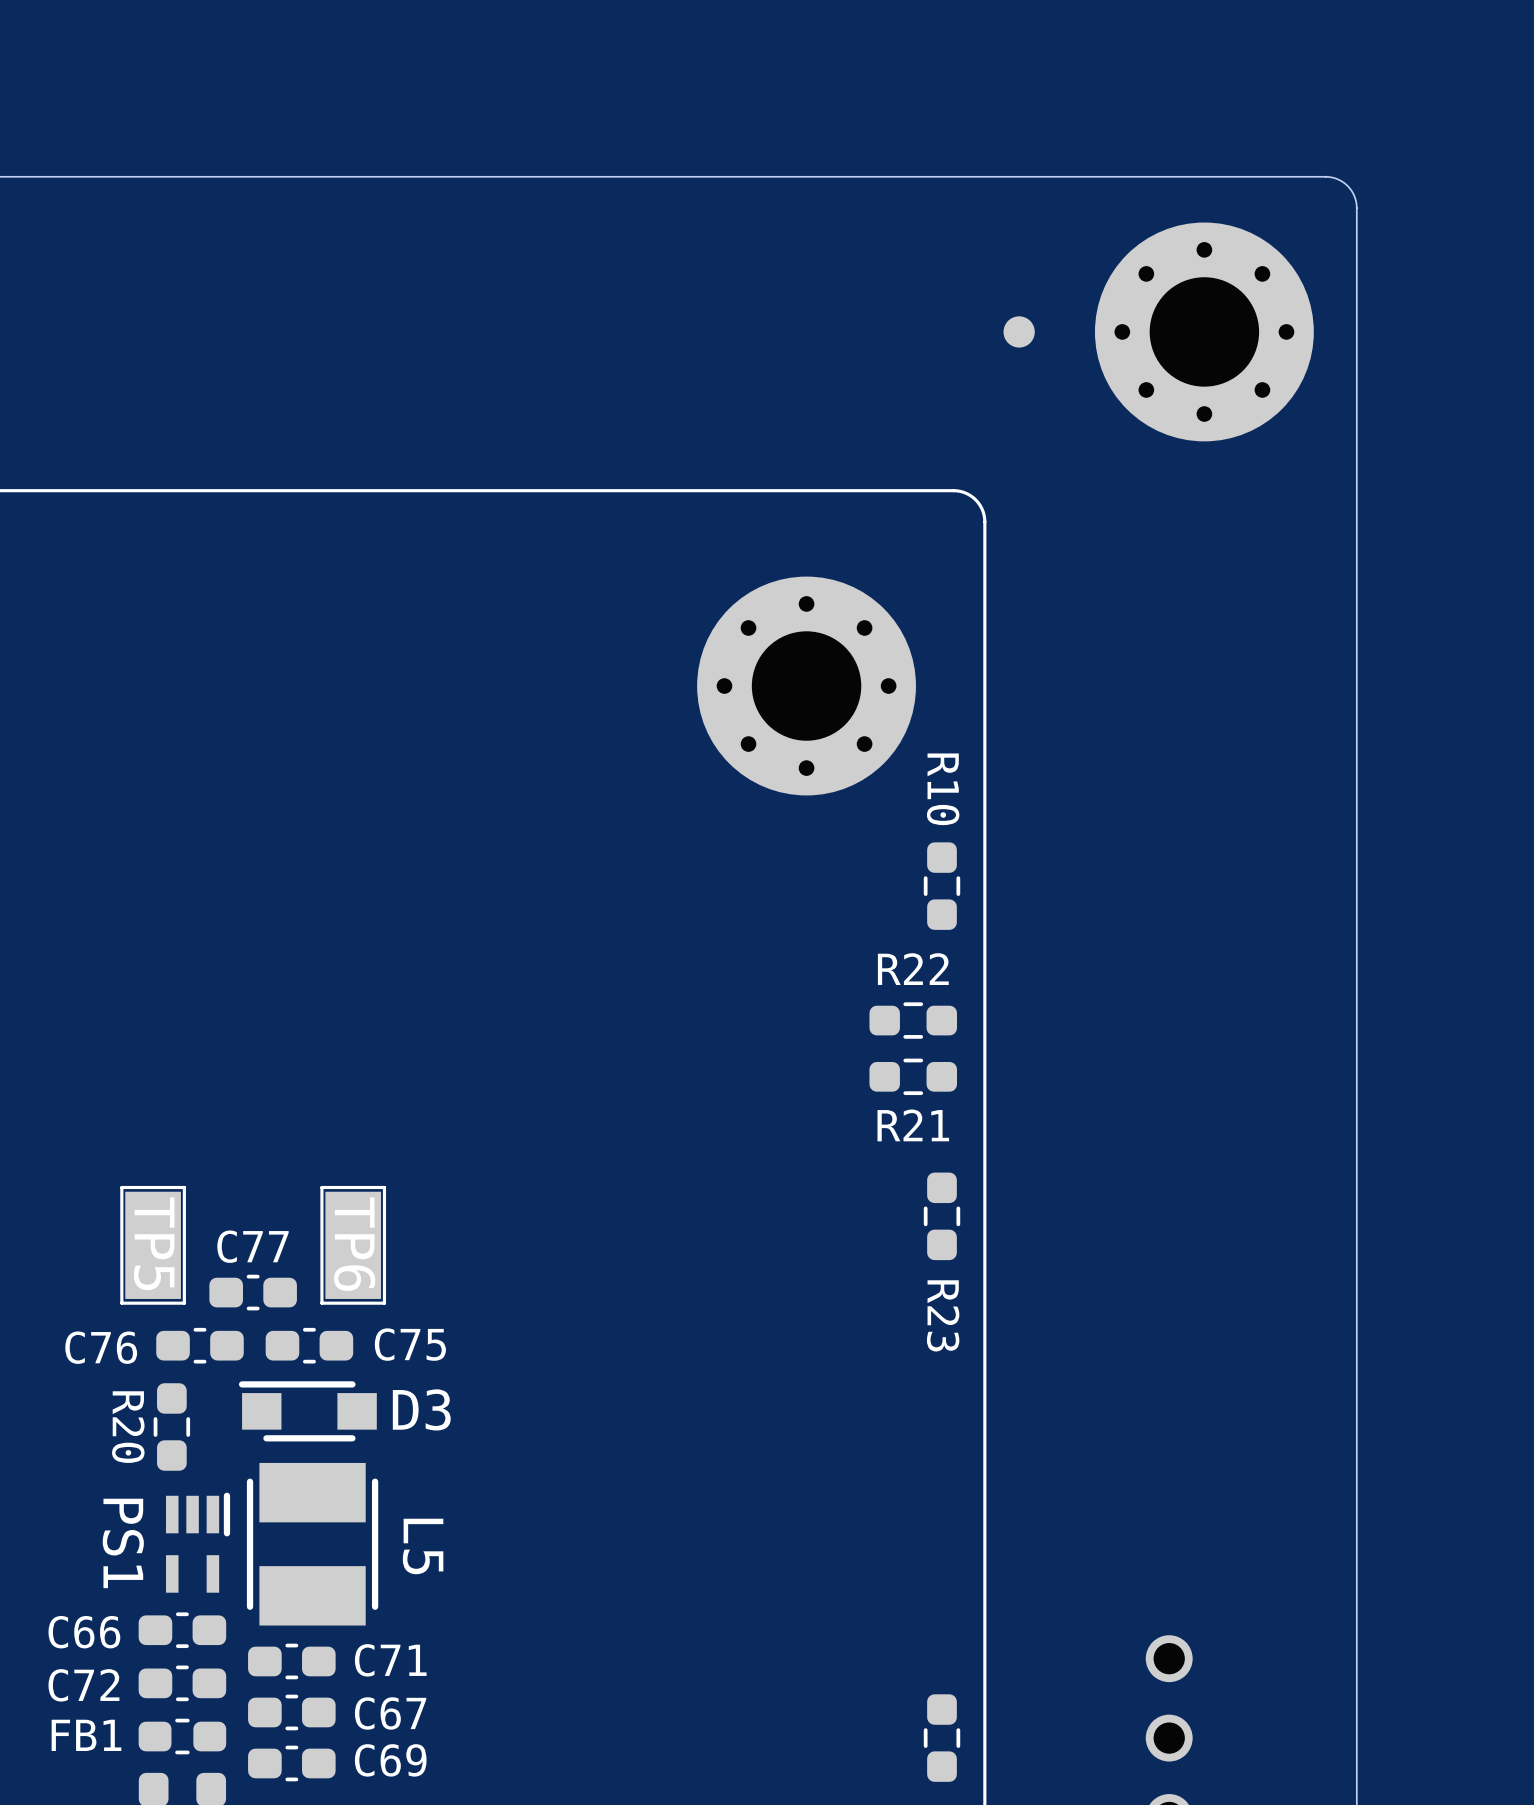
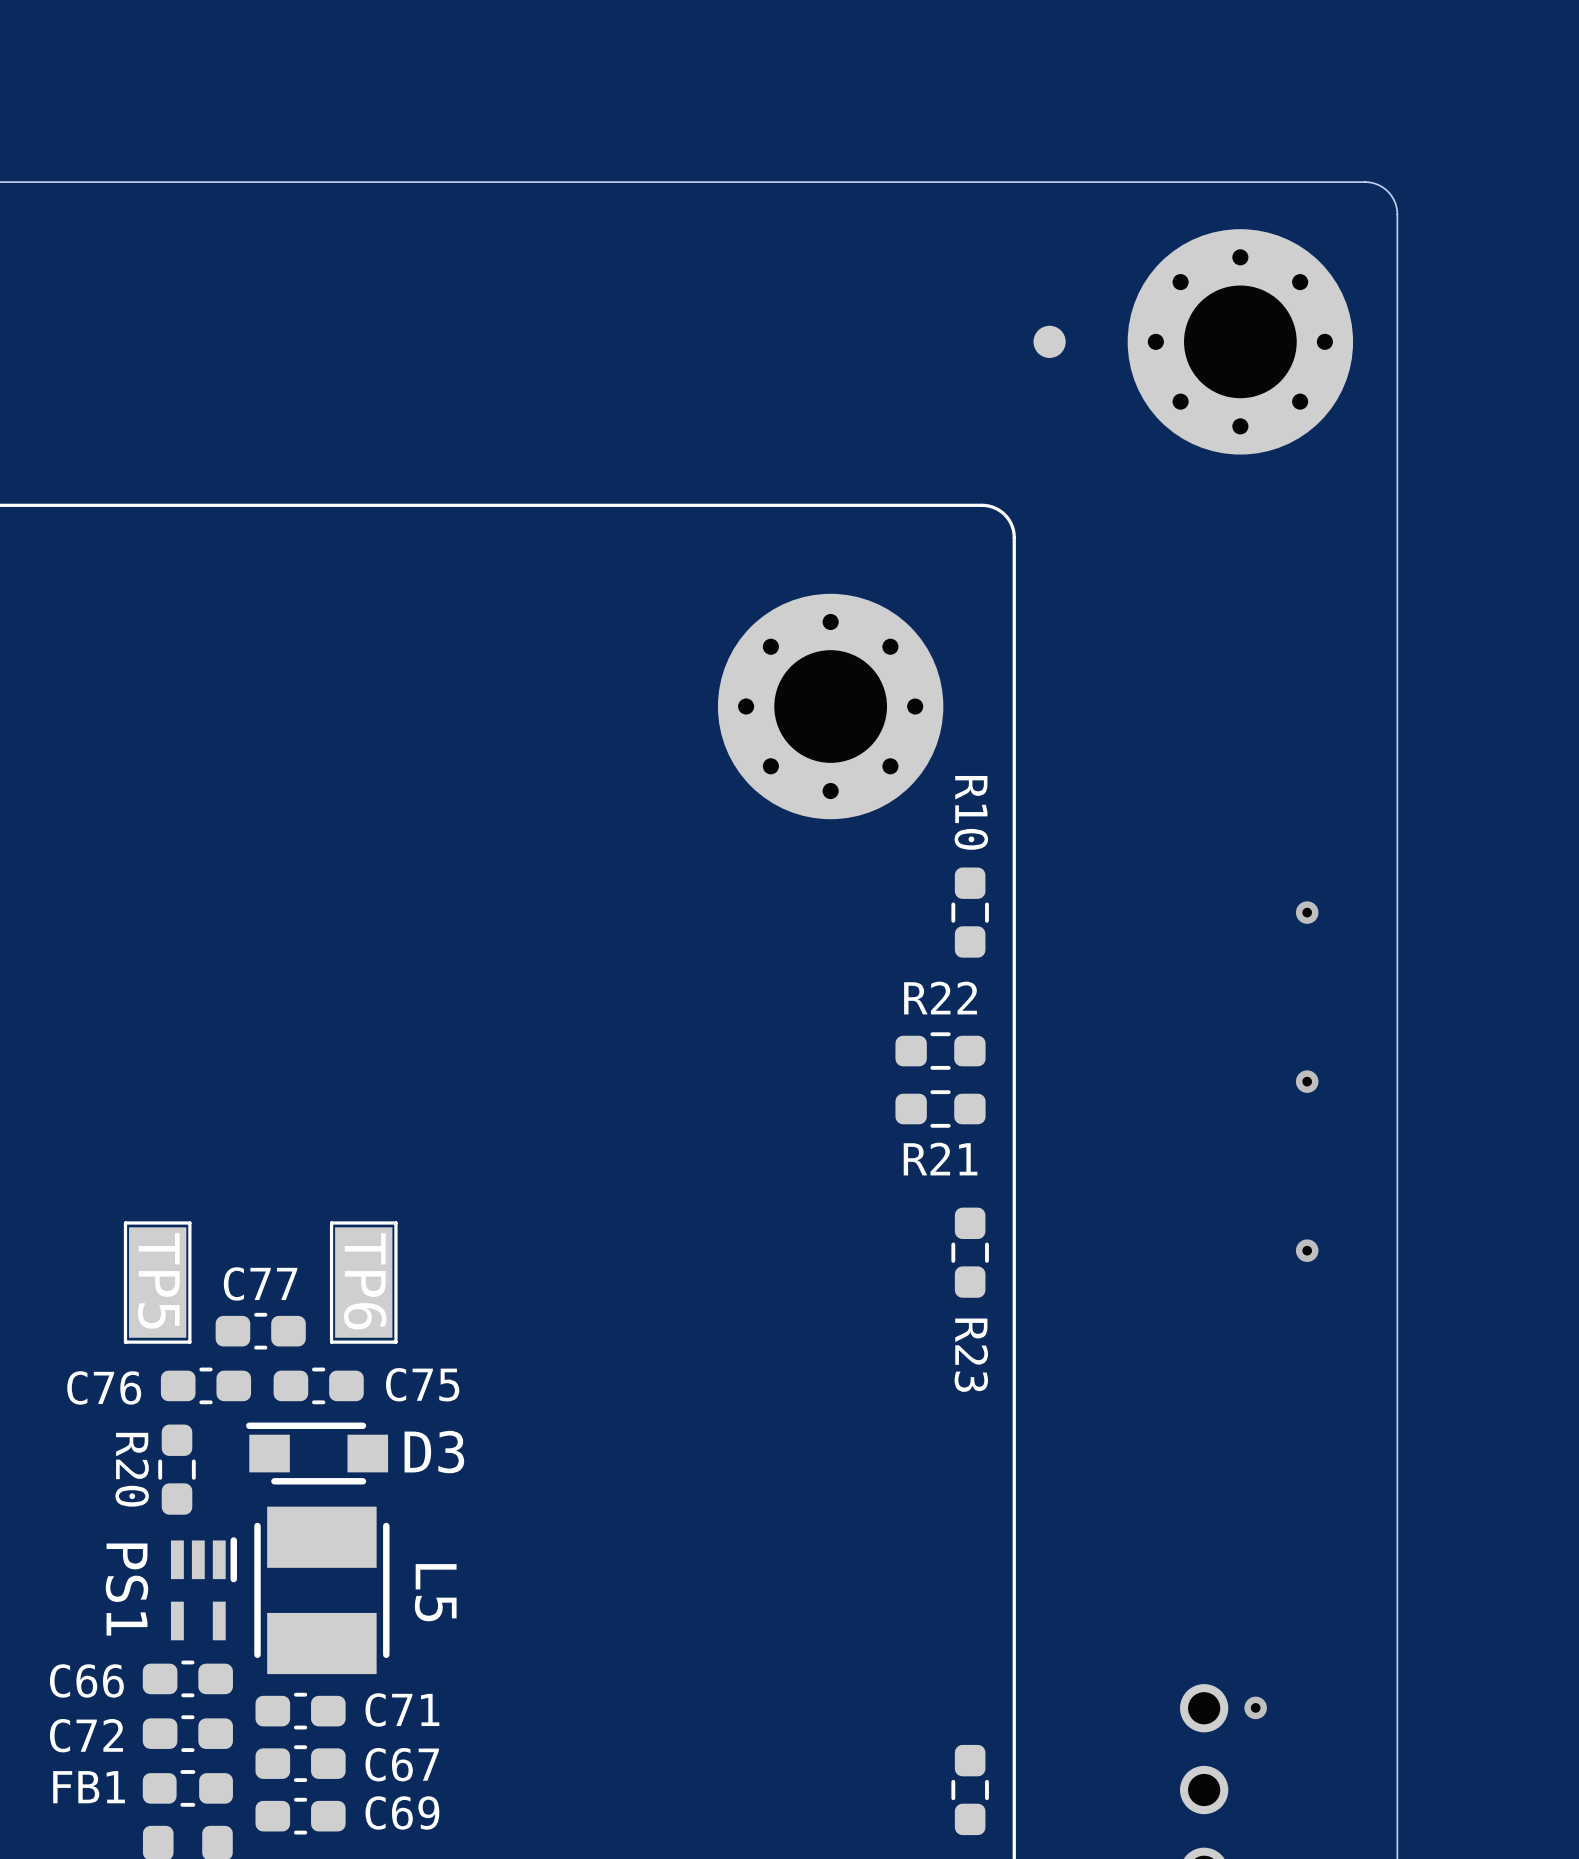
via: none -> (1307, 912)
via: none -> (1307, 1081)
via: none -> (1307, 1250)
via: none -> (1255, 1707)

